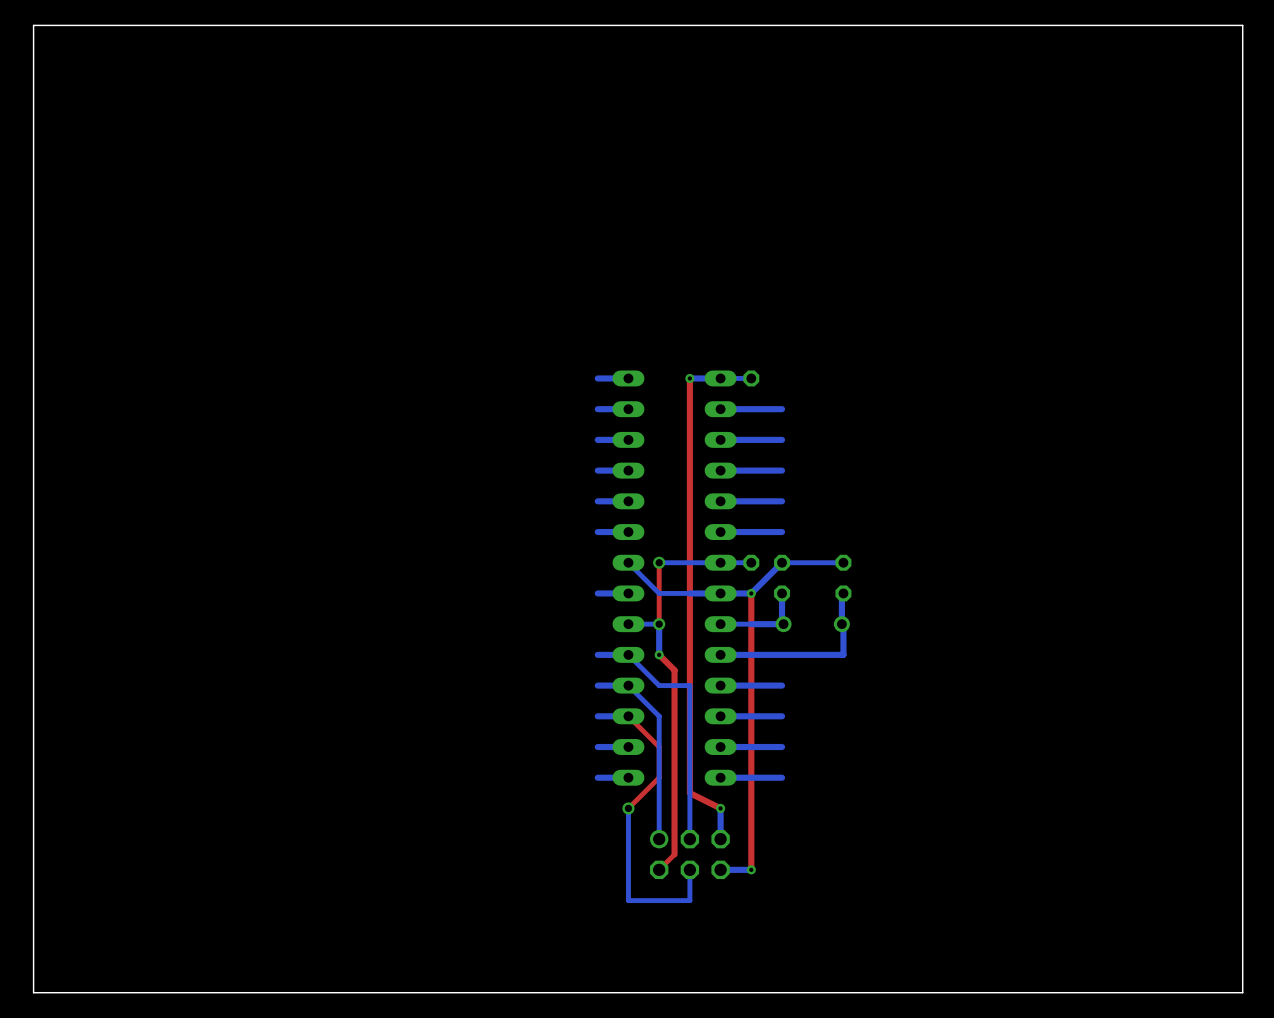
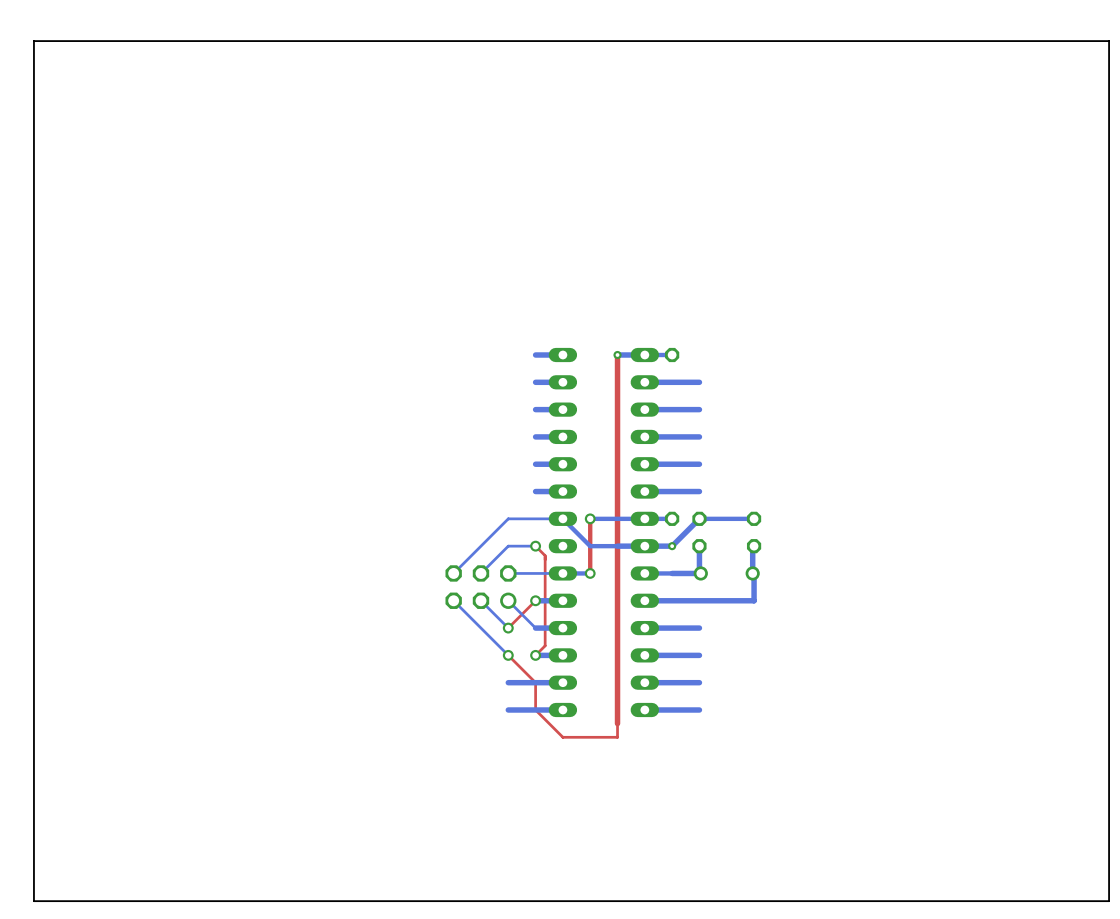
bottom track: none -> (562, 518) (508, 518) (453, 573)
top track: none -> (535, 546) (545, 555) (545, 645) (535, 655)
via: none -> (535, 546)
bottom track: (628, 593) (597, 593) -> (480, 573) (508, 546) (535, 546)
top track: (751, 593) (751, 869) -> none
bottom track: none -> (562, 573) (508, 573)
bottom track: (659, 624) (659, 654) -> none
bottom track: none -> (453, 600) (508, 655)
bottom track: none -> (480, 600) (508, 628)
bottom track: none -> (508, 600) (535, 628)
top track: none -> (535, 600) (508, 628)
via: none -> (535, 600)
bottom track: (628, 654) (659, 685) (689, 685) (689, 839) -> none
top track: (659, 654) (674, 670) (674, 854) (659, 869) -> none
via: (659, 654) -> none
via: none -> (508, 628)
bottom track: (628, 685) (659, 716) (659, 839) -> none
via: none -> (508, 655)
via: none -> (535, 655)
top track: (628, 716) (659, 747) (659, 777) (628, 808) -> none
bottom track: none -> (535, 682) (508, 682)
top track: (689, 793) (720, 808) -> (617, 723) (617, 737) (562, 737) (535, 709) (535, 682) (508, 655)
bottom track: (628, 808) (628, 900) (689, 900) (689, 869) -> none
via: (628, 808) -> none
bottom track: (720, 808) (720, 839) -> none
via: (720, 808) -> none
part rotation: 0° (689, 854) -> 180° (480, 587)
part position: (689, 854) -> (480, 587)
bottom track: (751, 869) (720, 869) -> (535, 709) (508, 709)
via: (751, 869) -> none

